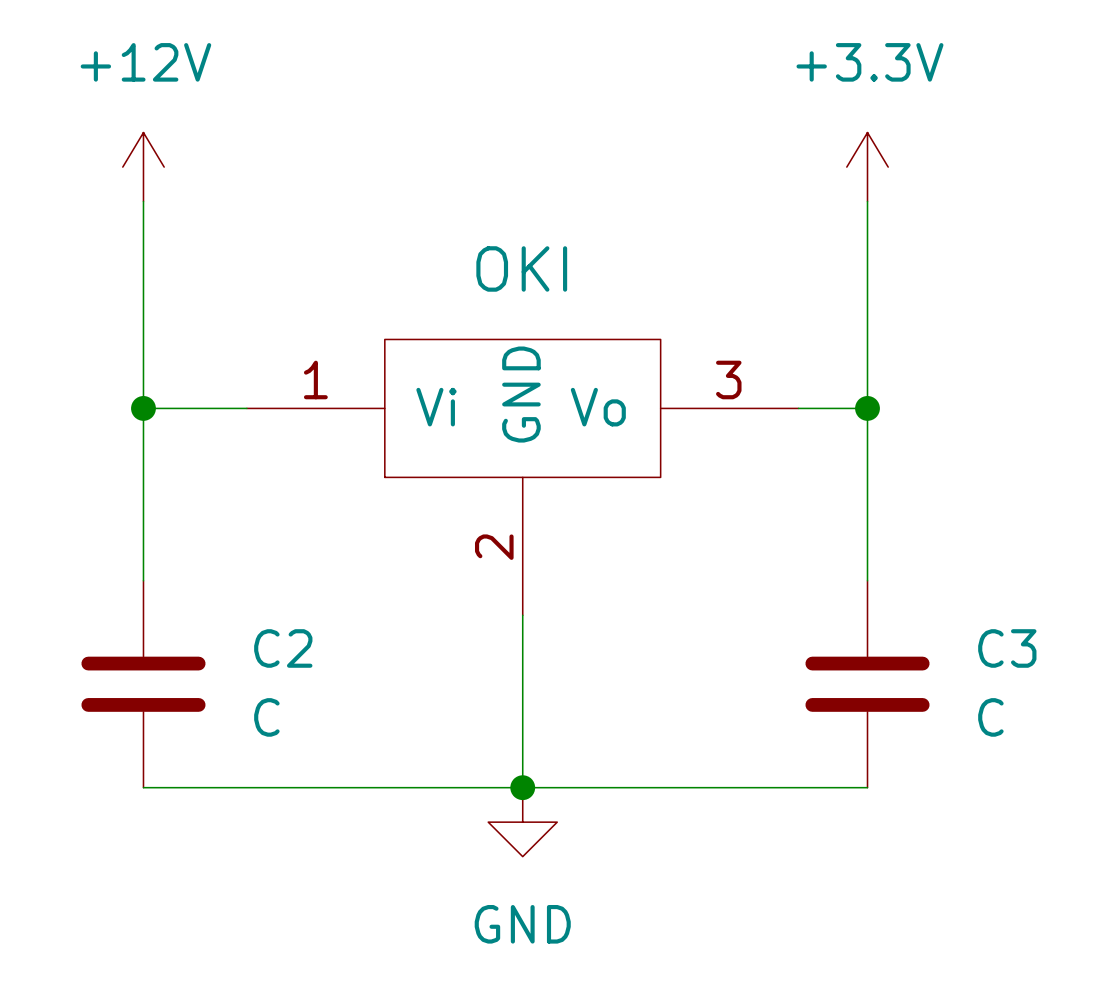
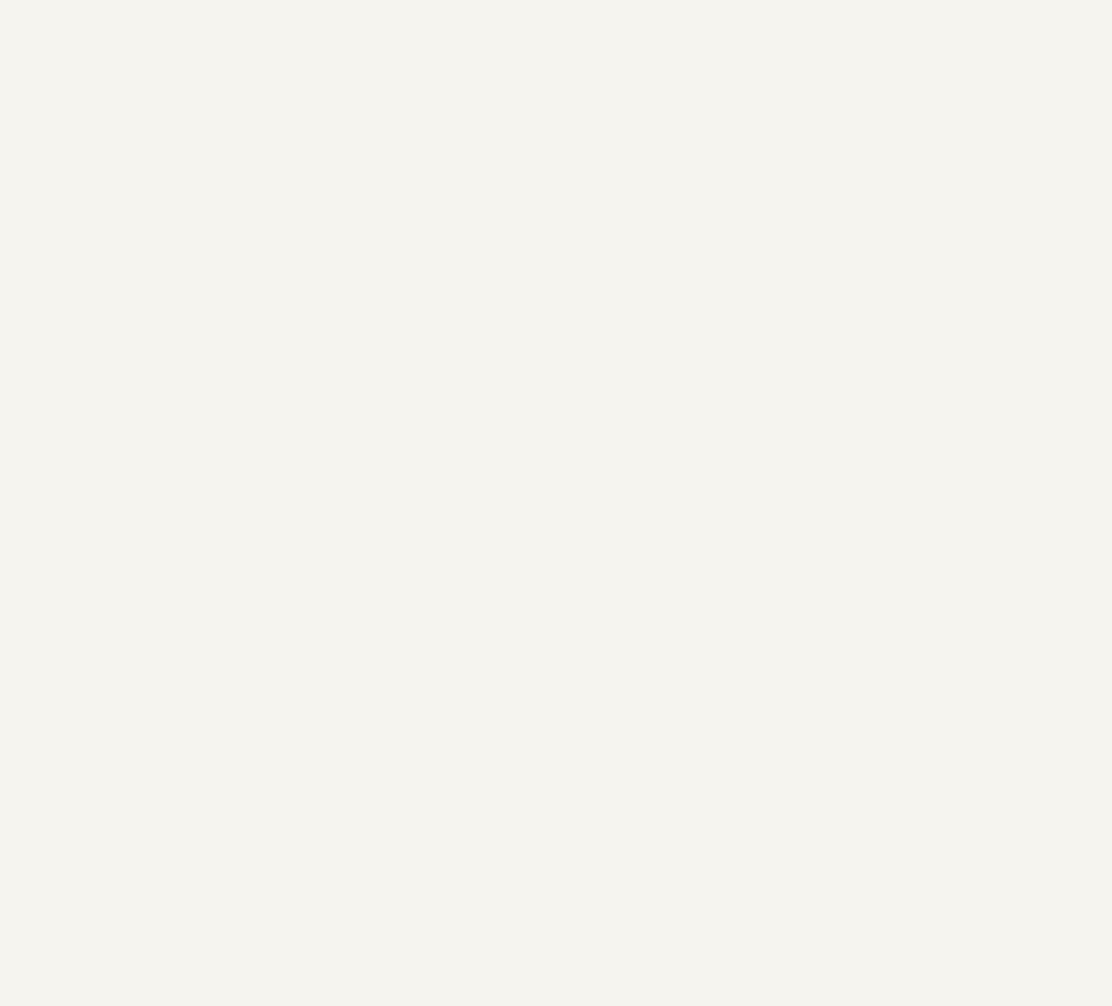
power symbol: +12V (143, 167) -> none
power symbol: +3.3V (867, 167) -> none
wire: (143, 201) (143, 580) -> none
wire: (867, 201) (867, 580) -> none
wire: (143, 408) (246, 408) -> none
junction: (143, 408) -> none
wire: (798, 408) (867, 408) -> none
junction: (867, 408) -> none
part: OKI (522, 477) -> none
wire: (522, 615) (522, 787) -> none
C2: C (143, 684) -> none
C3: C (867, 684) -> none
wire: (143, 787) (867, 787) -> none
junction: (522, 787) -> none
power symbol: GND (522, 822) -> none

